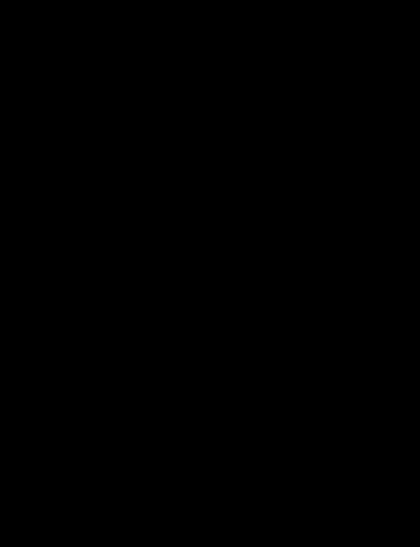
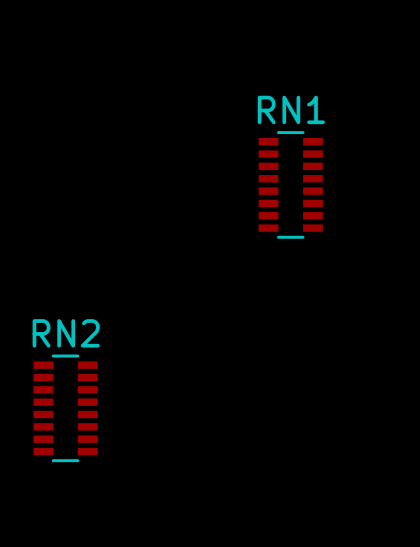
RN1: none -> (290, 184)
RN2: none -> (65, 408)

